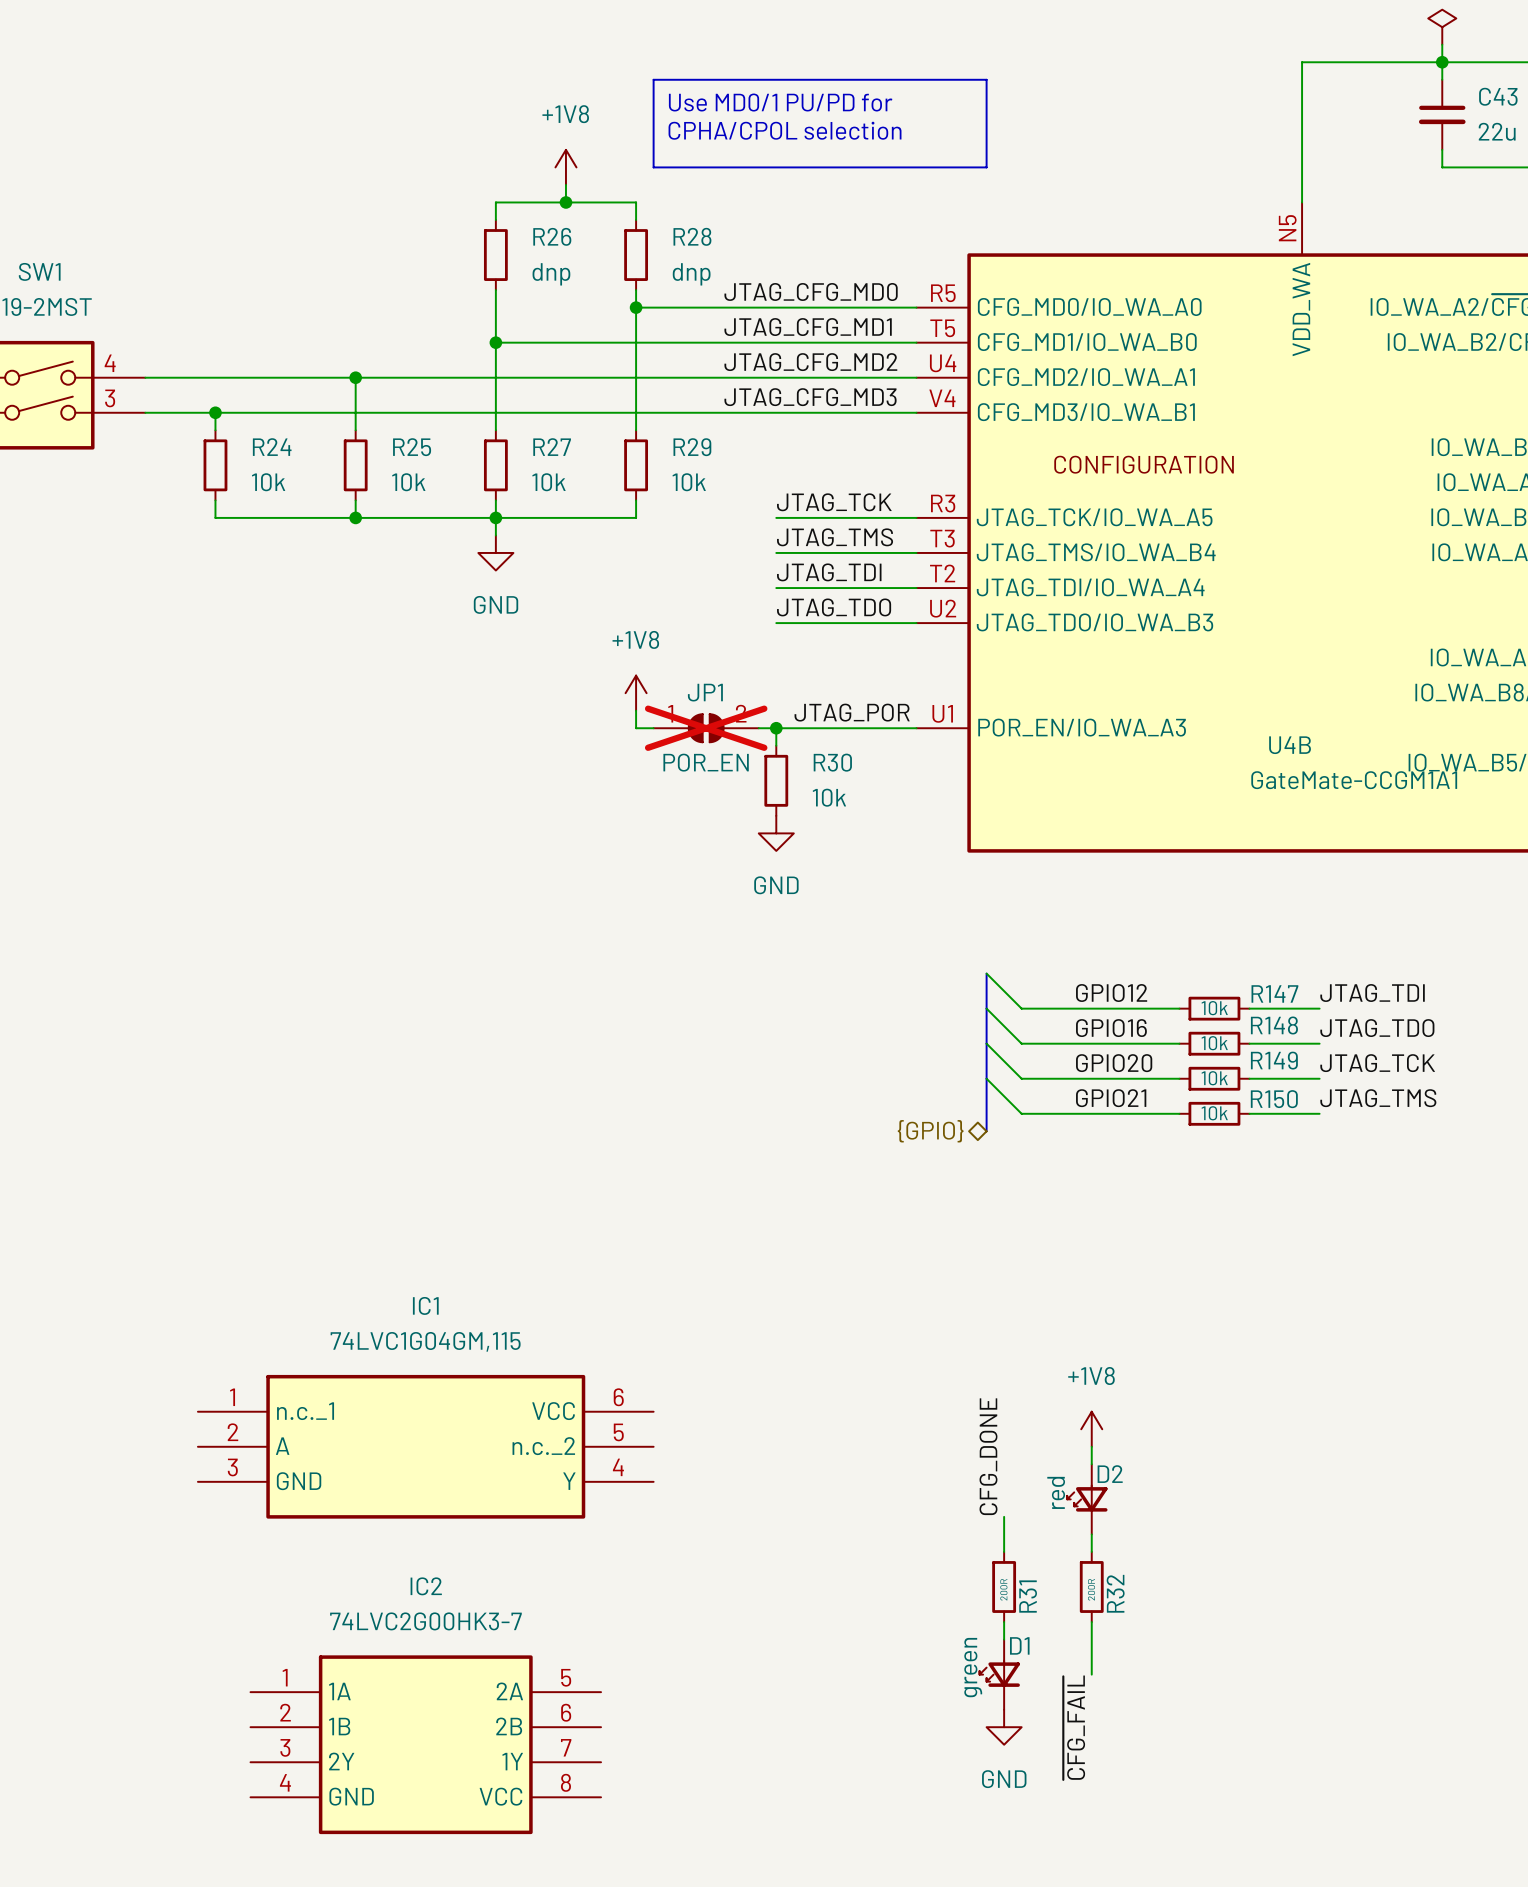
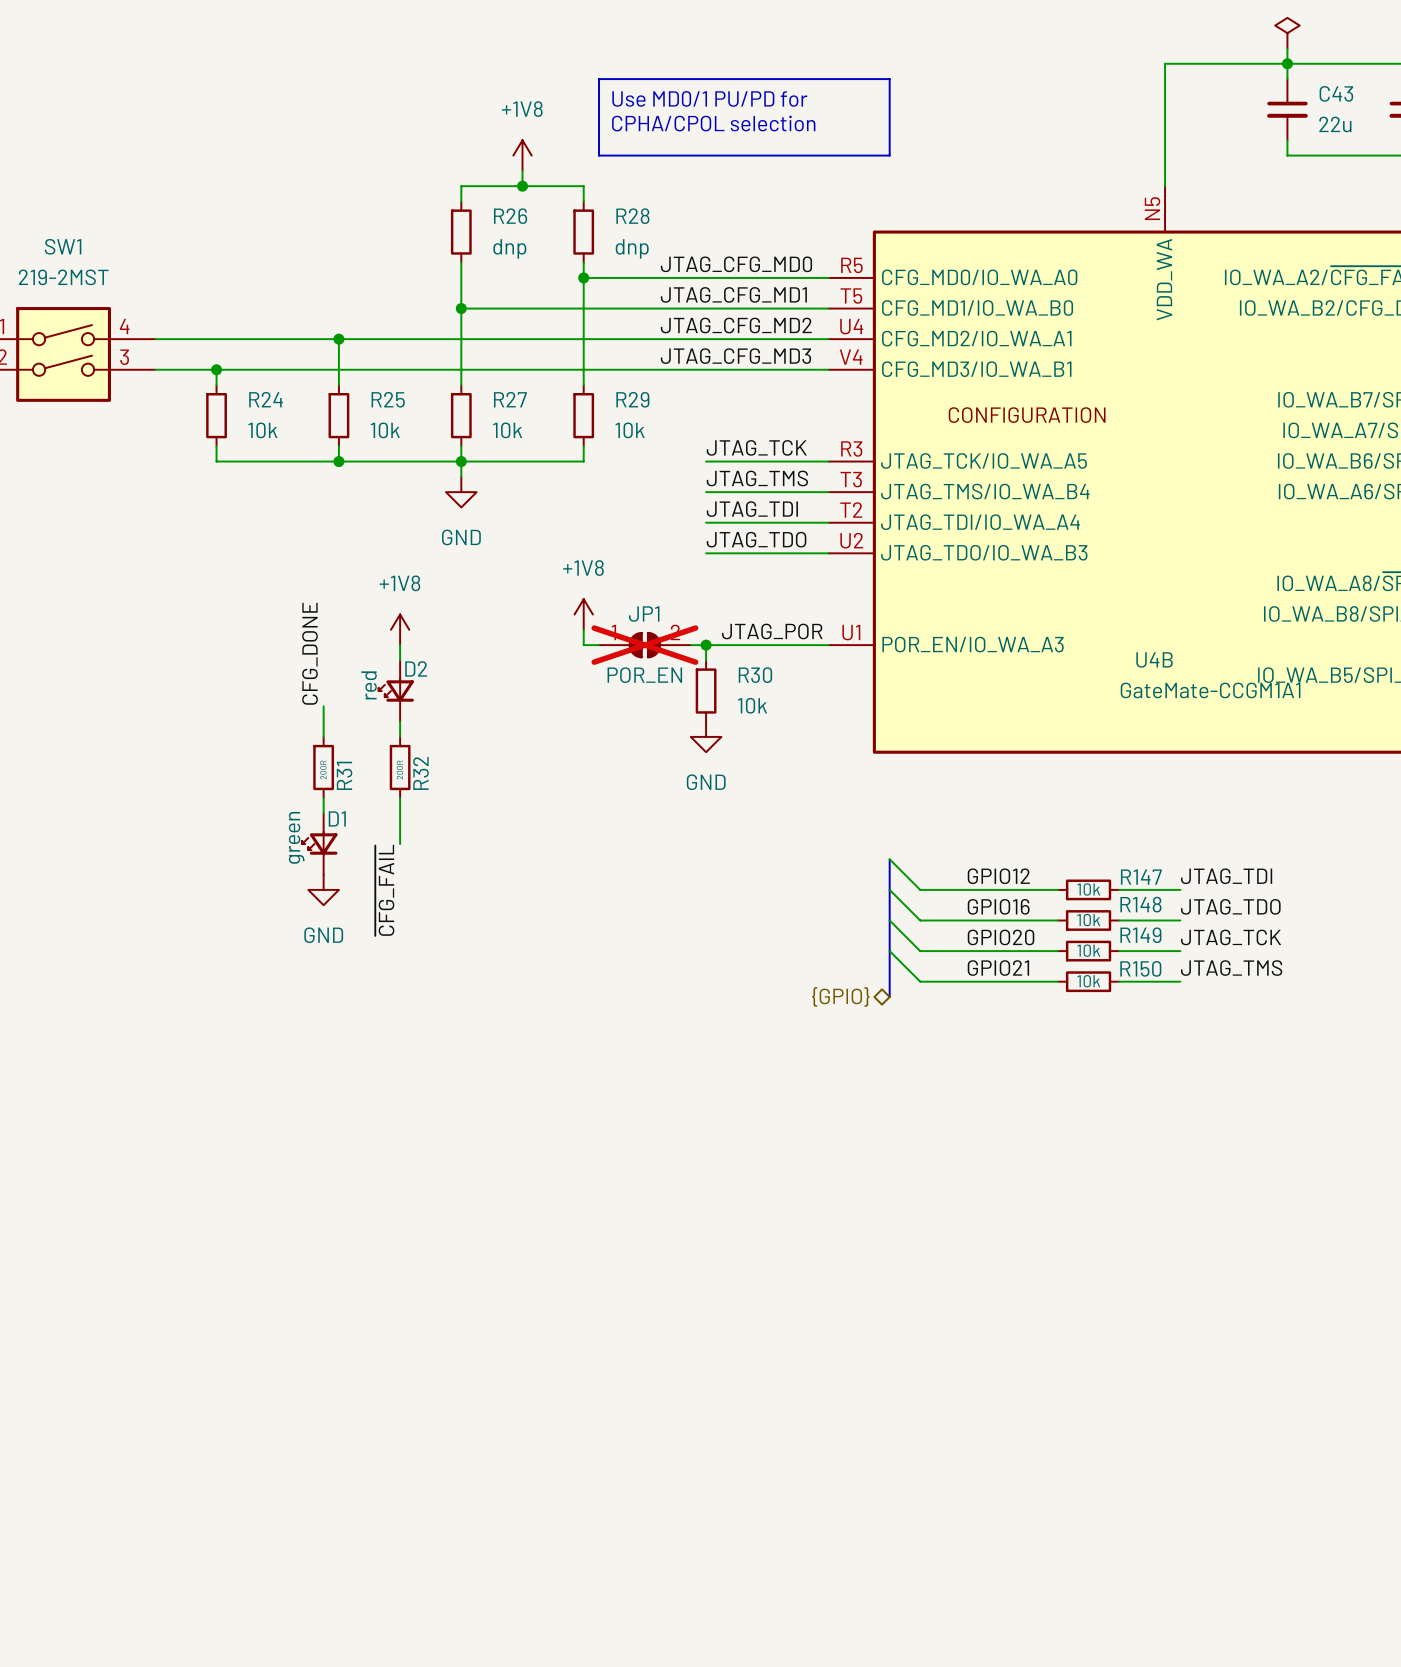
power symbol: none -> +1V8 (400, 629)
wire: none -> (400, 645) (400, 660)
label: none -> CFG_DONE (309, 653)
wire: none -> (323, 706) (323, 736)
wire: none -> (400, 721) (400, 736)
wire: none -> (323, 798) (323, 813)
wire: none -> (400, 798) (400, 844)
power symbol: none -> GND (323, 889)
label: none -> ~{CFG_FAIL} (384, 890)
power symbol: +1V8 (1091, 1429) -> none
IC1: 74LVC1G04GM,115 (425, 1446) -> none
wire: (1091, 1446) (1091, 1464) -> none
label: CFG_DONE (988, 1456) -> none
D2 position: (1087, 1499) -> (396, 691)
wire: (1004, 1516) (1004, 1551) -> none
wire: (1091, 1534) (1091, 1551) -> none
R31 position: (1004, 1586) -> (323, 767)
R32 position: (1091, 1586) -> (400, 767)
wire: (1004, 1622) (1004, 1639) -> none
wire: (1091, 1622) (1091, 1674) -> none
D1 position: (999, 1674) -> (319, 844)
power symbol: GND (1004, 1727) -> none
label: ~{CFG_FAIL} (1074, 1727) -> none
IC2: 74LVC2G00HK3-7 (425, 1744) -> none

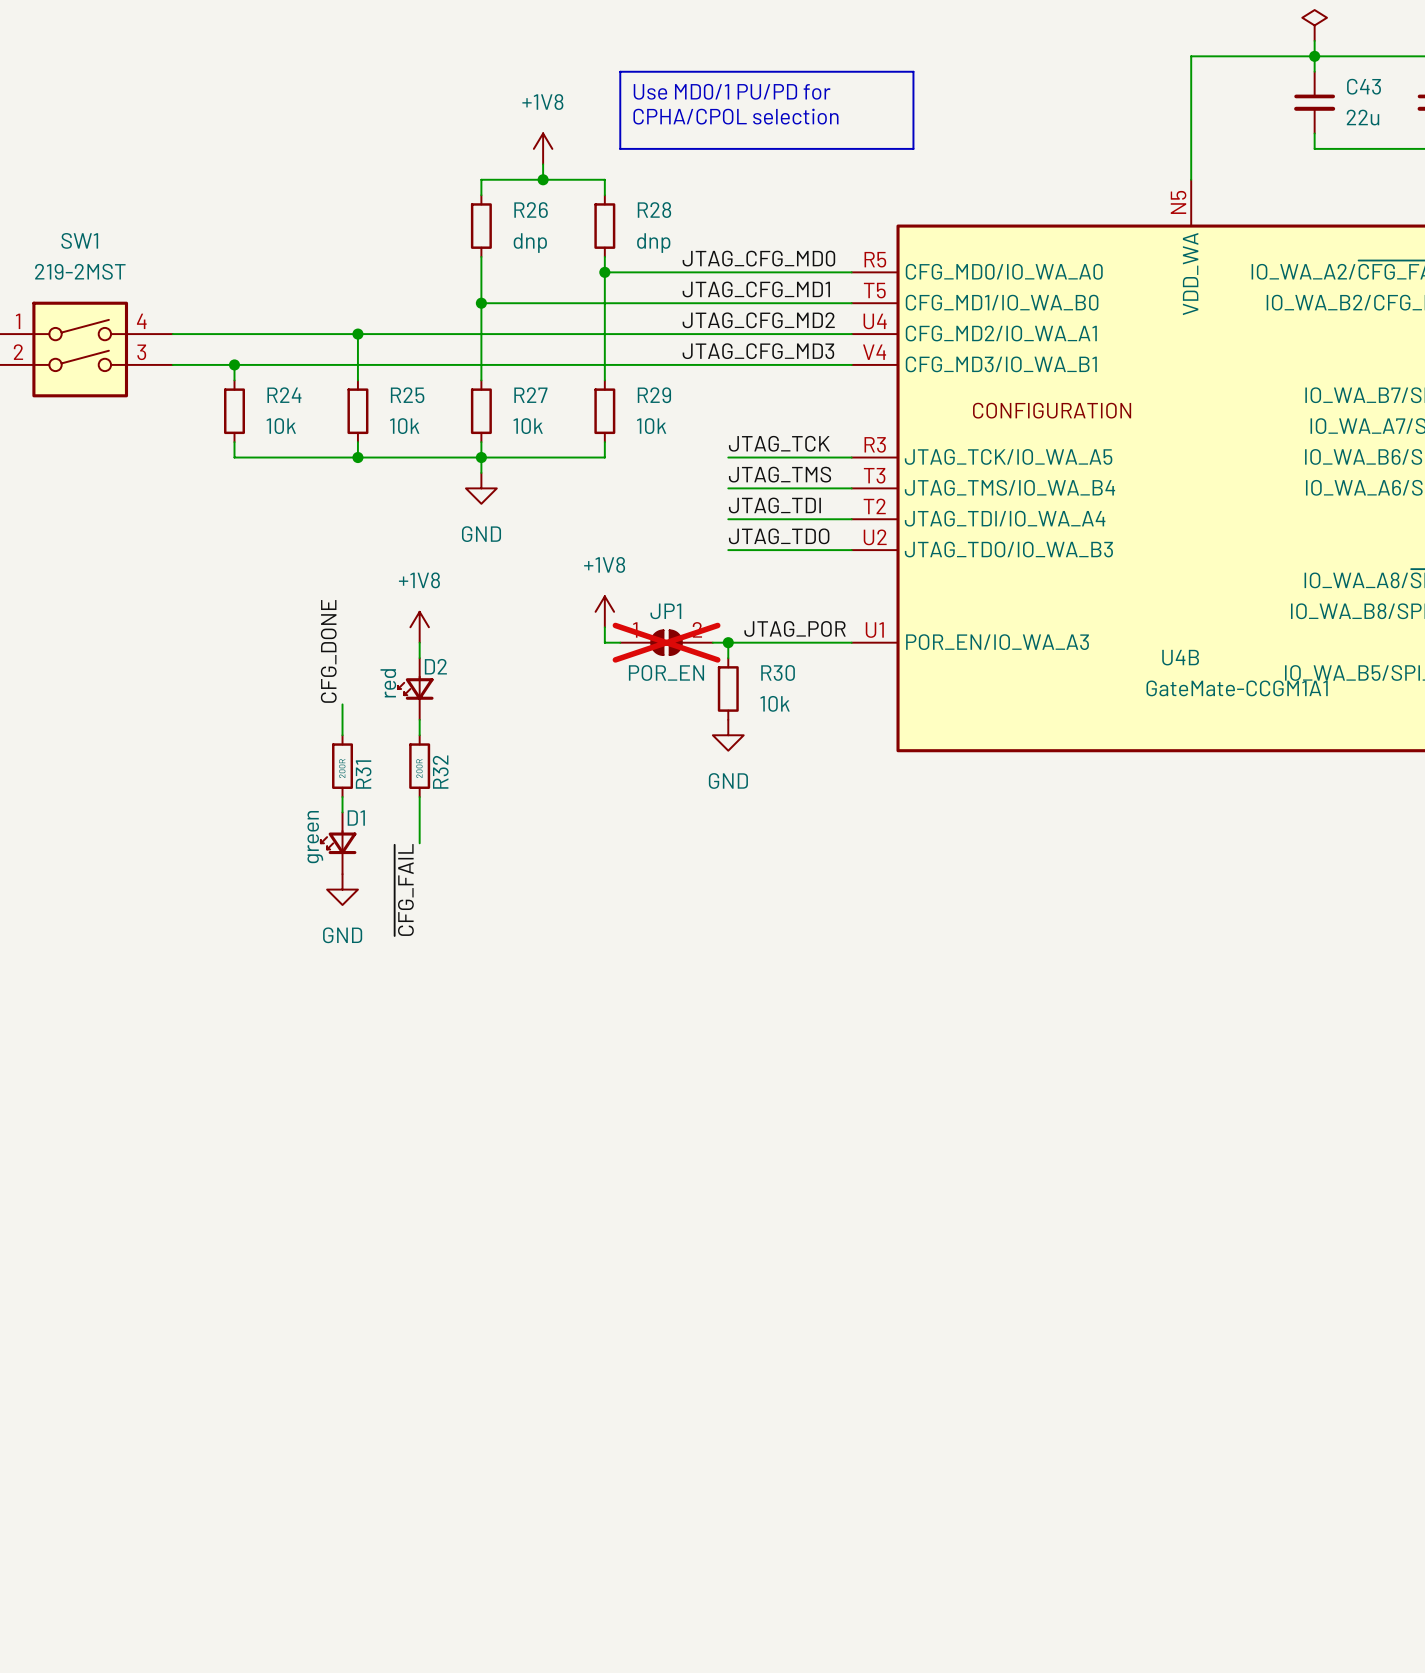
wire: (889, 859) (920, 889) (1057, 889) -> none
bus: (889, 859) (889, 996) -> none
label: GPIO12 (998, 876) -> none
label: JTAG_TDI (1226, 876) -> none
wire: (889, 889) (920, 920) (1057, 920) -> none
R147: 10k (1088, 889) -> none
wire: (1119, 889) (1180, 889) -> none
label: GPIO16 (998, 906) -> none
label: JTAG_TDO (1230, 906) -> none
wire: (889, 920) (920, 951) (1057, 951) -> none
R148: 10k (1088, 920) -> none
wire: (1119, 920) (1180, 920) -> none
label: GPIO20 (1001, 937) -> none
label: JTAG_TCK (1231, 937) -> none
wire: (889, 951) (920, 981) (1057, 981) -> none
R149: 10k (1088, 951) -> none
wire: (1119, 951) (1180, 951) -> none
label: GPIO21 (998, 968) -> none
label: JTAG_TMS (1231, 968) -> none
R150: 10k (1088, 981) -> none
wire: (1119, 981) (1180, 981) -> none
hierarchical label: {GPIO} (840, 996) -> none

